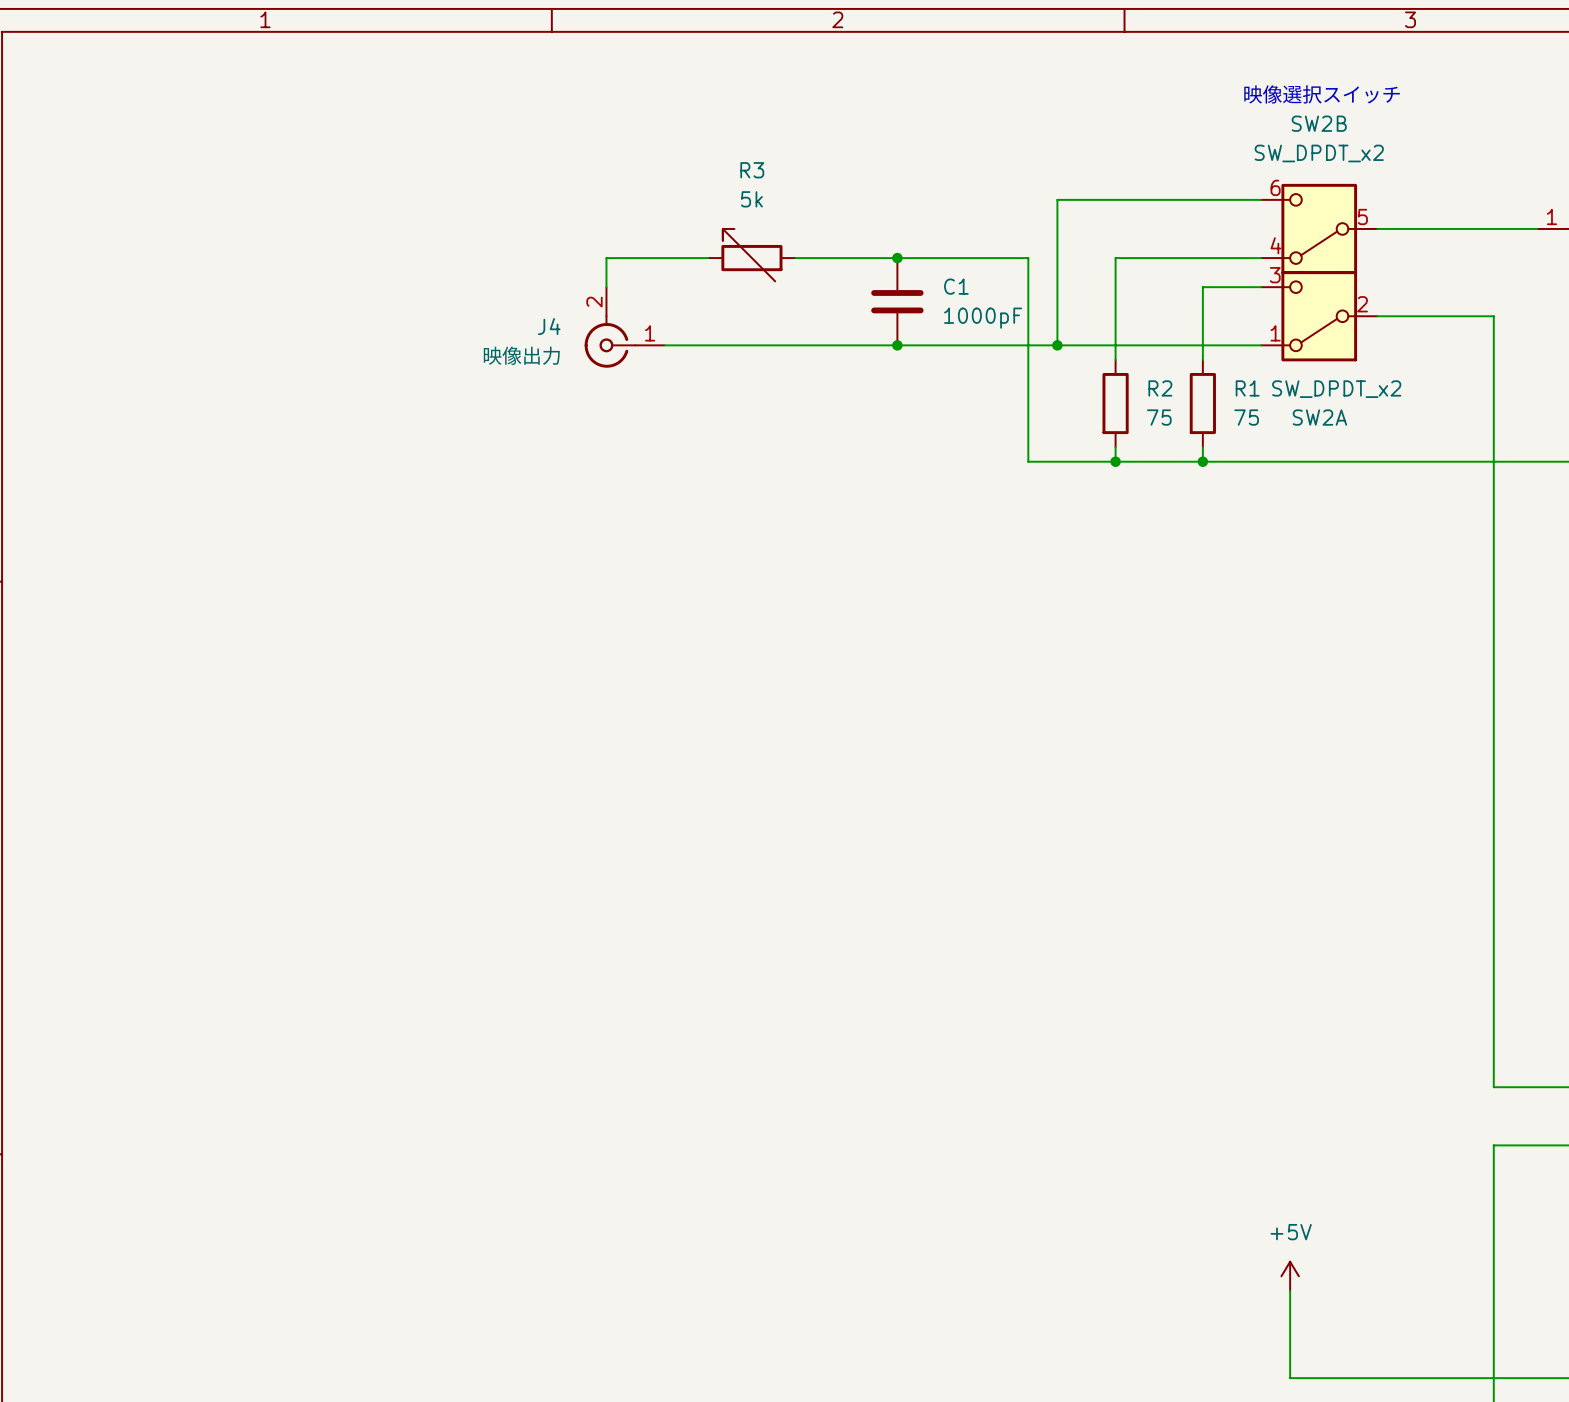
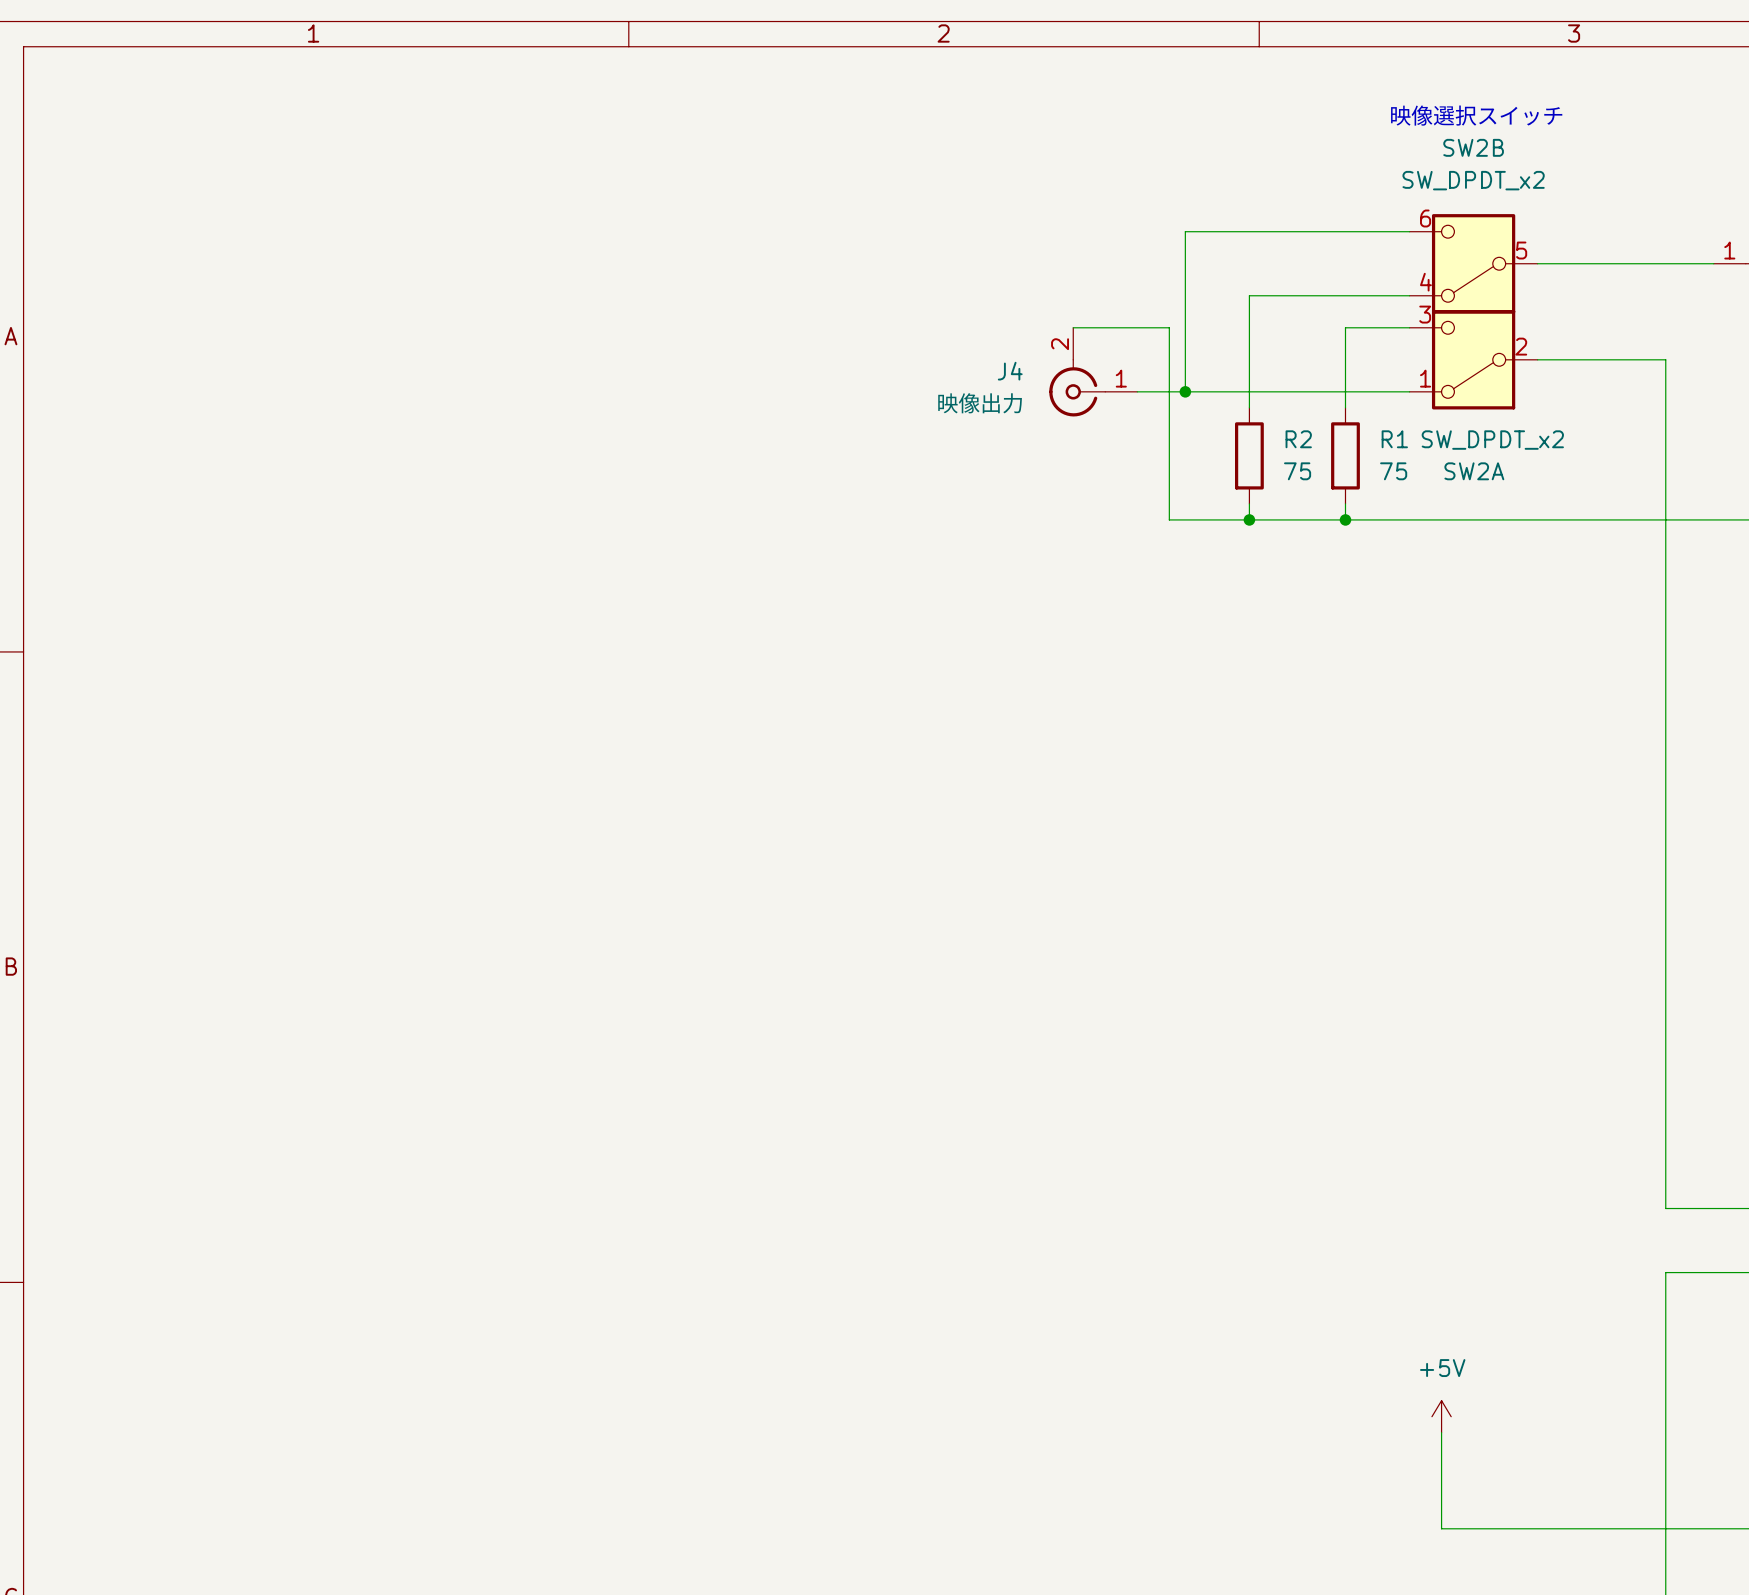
R3: 5k (751, 255) -> none
wire: (708, 258) (606, 258) (606, 287) -> none
wire: (795, 258) (1028, 258) (1028, 461) (1042, 461) -> (1073, 327) (1169, 327) (1169, 519)
junction: (897, 258) -> none
C1: 1000pF (897, 301) -> none
J4 position: (624, 327) -> (1093, 372)
wire: (664, 345) (1013, 345) -> none
junction: (897, 345) -> none

